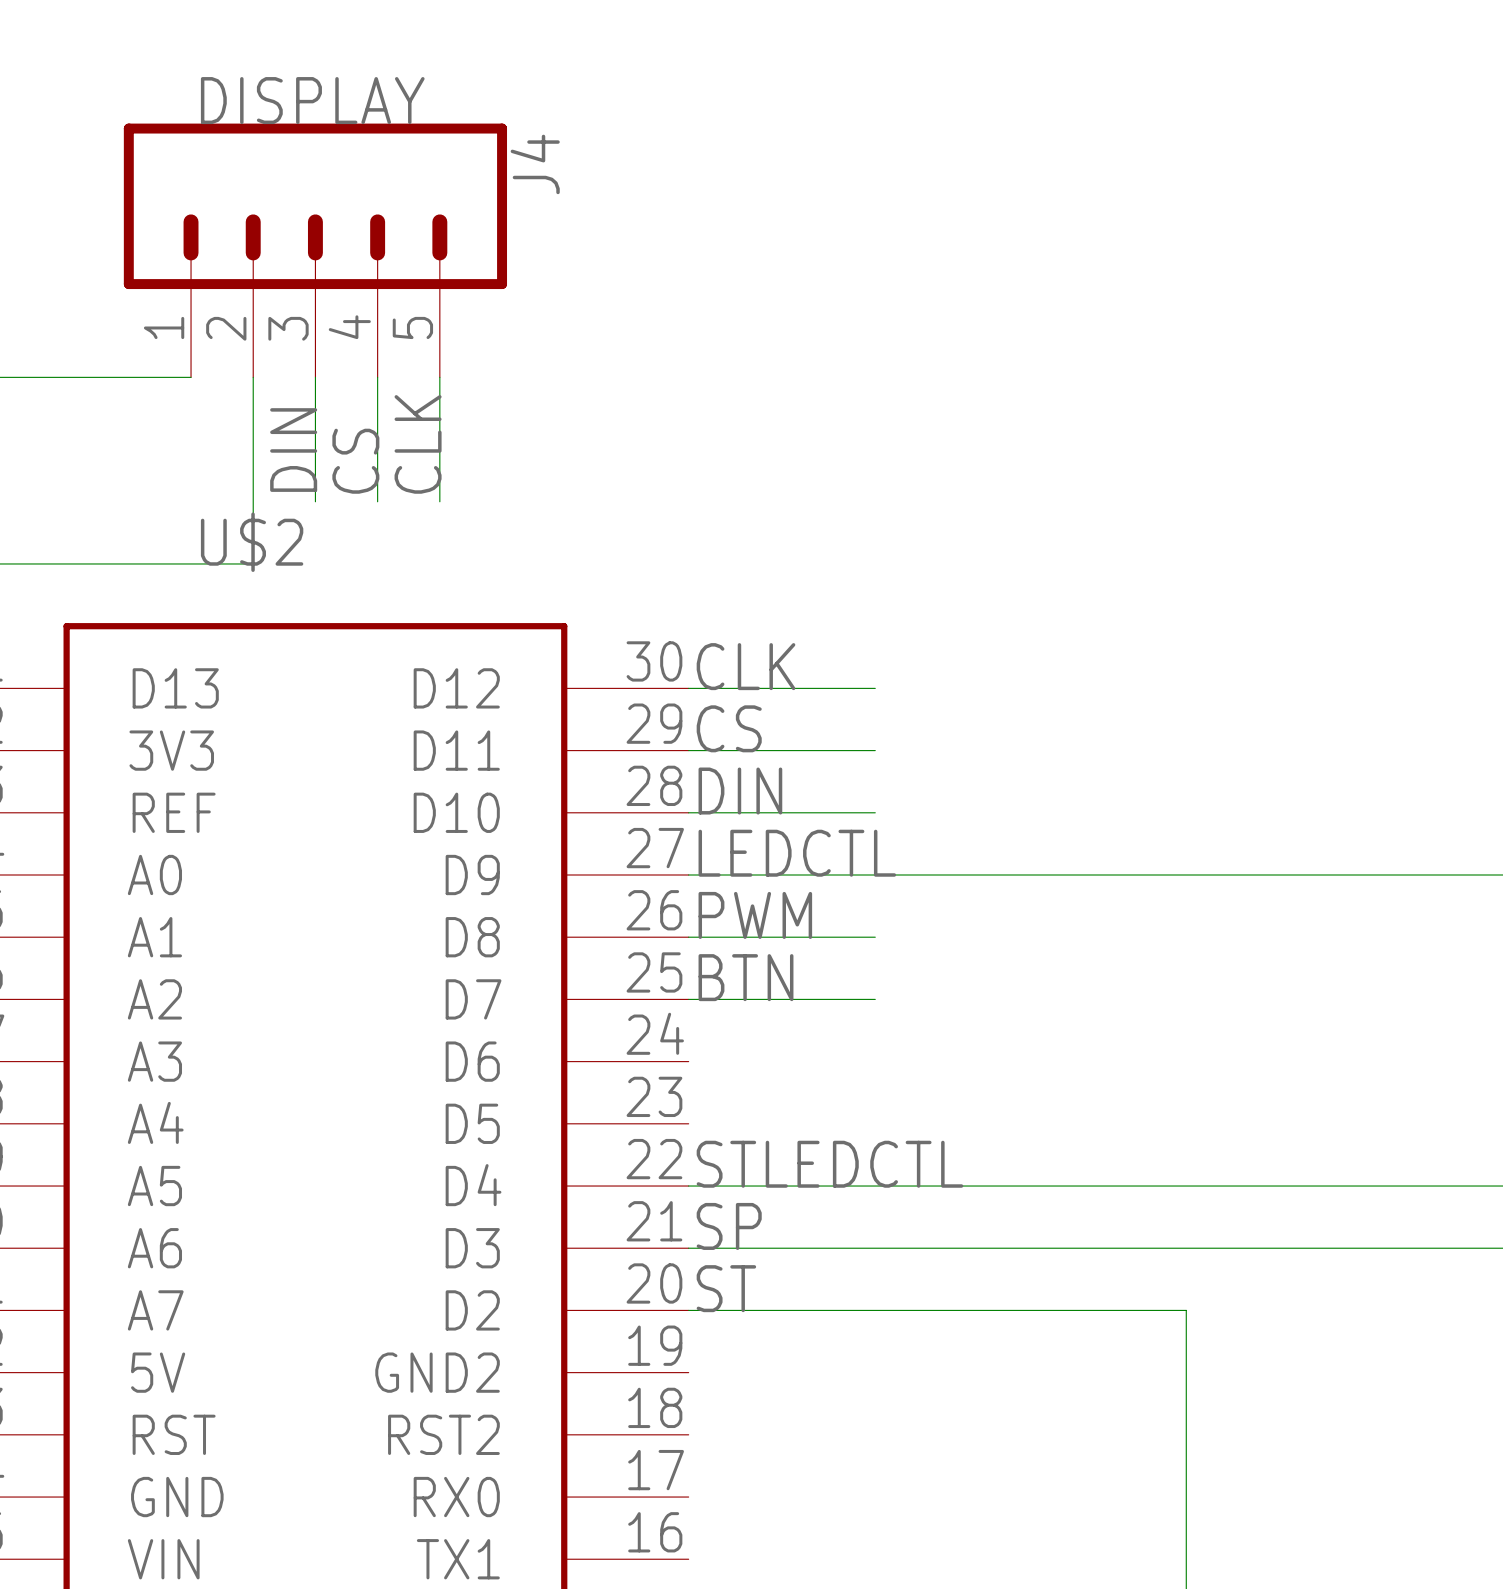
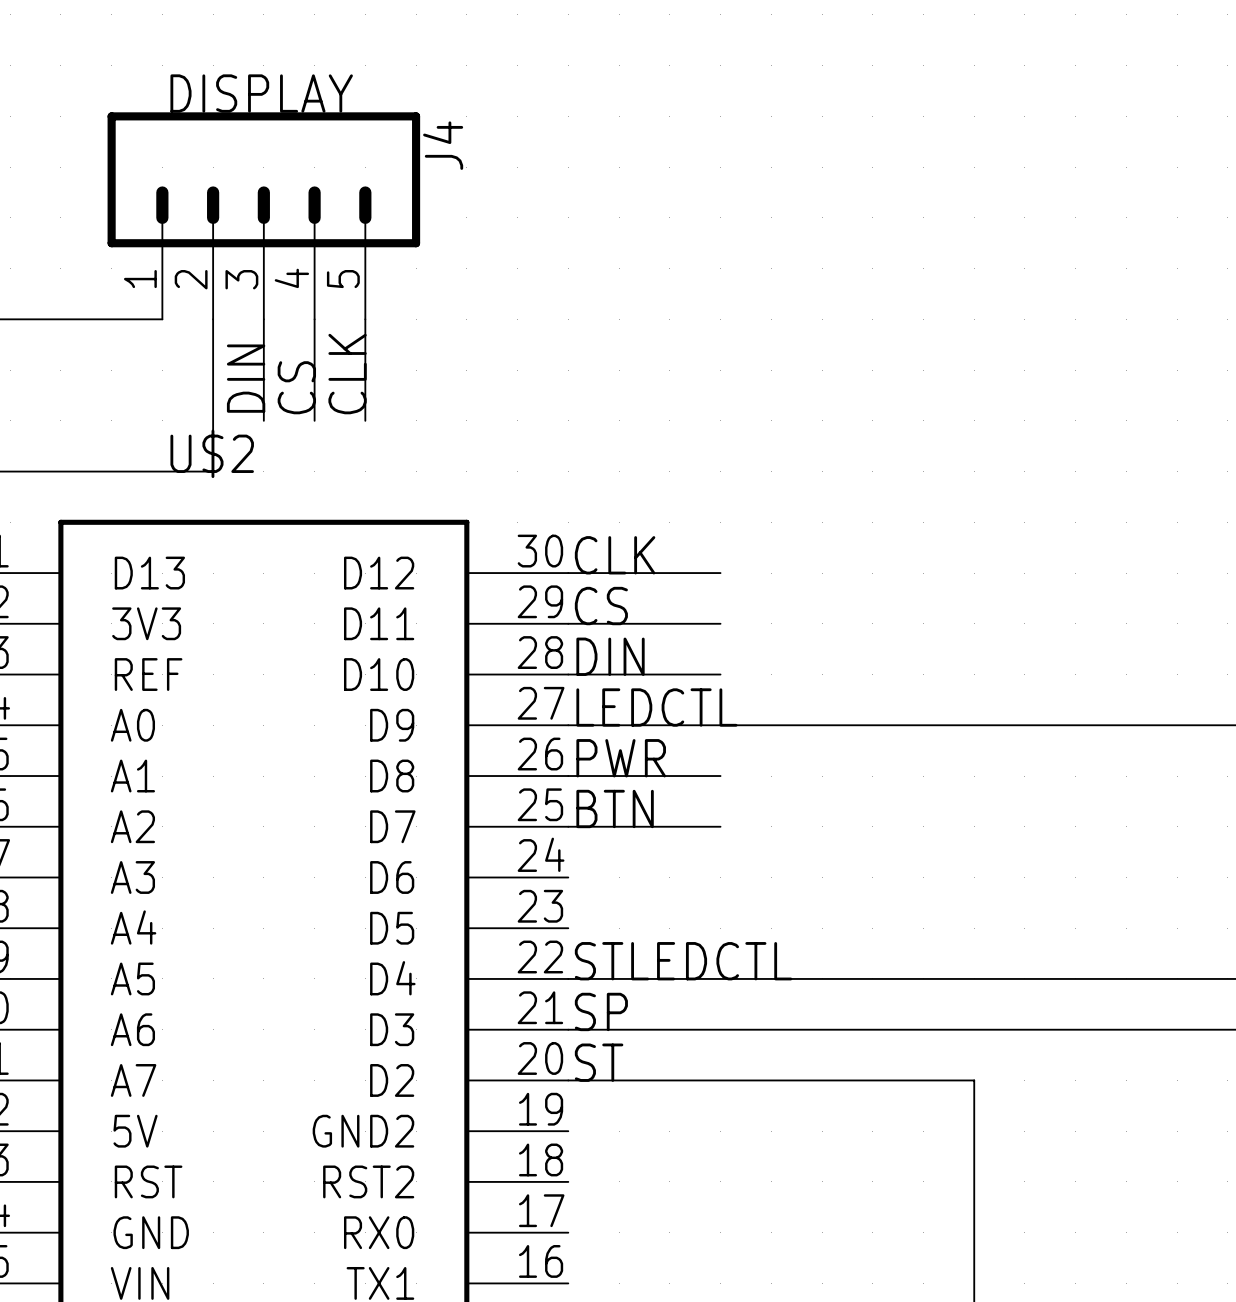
label: PWM (755, 915) -> PWR (621, 758)

